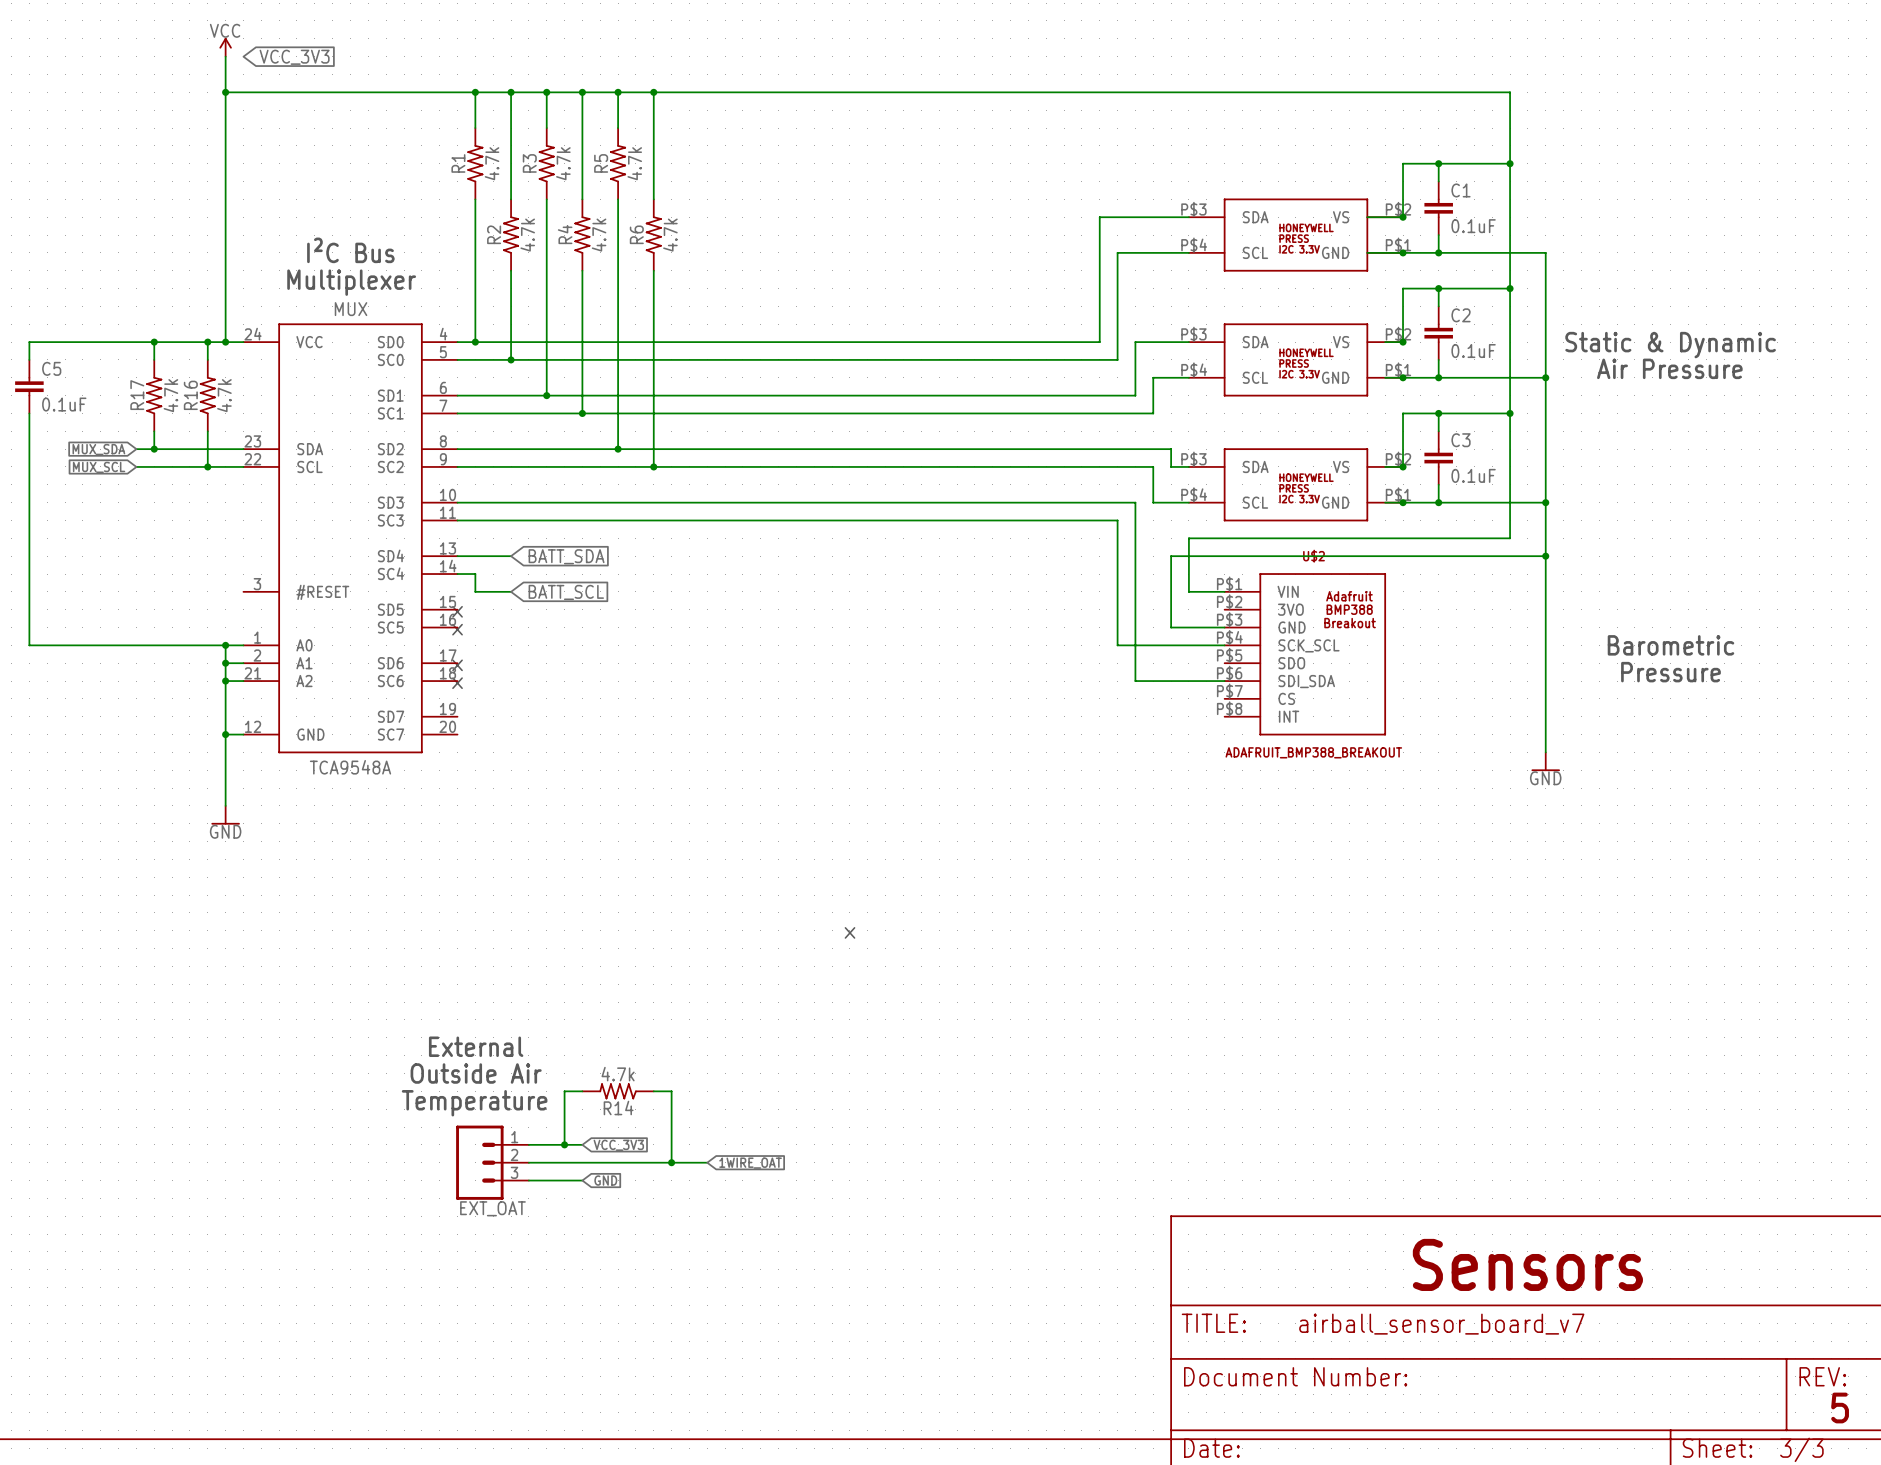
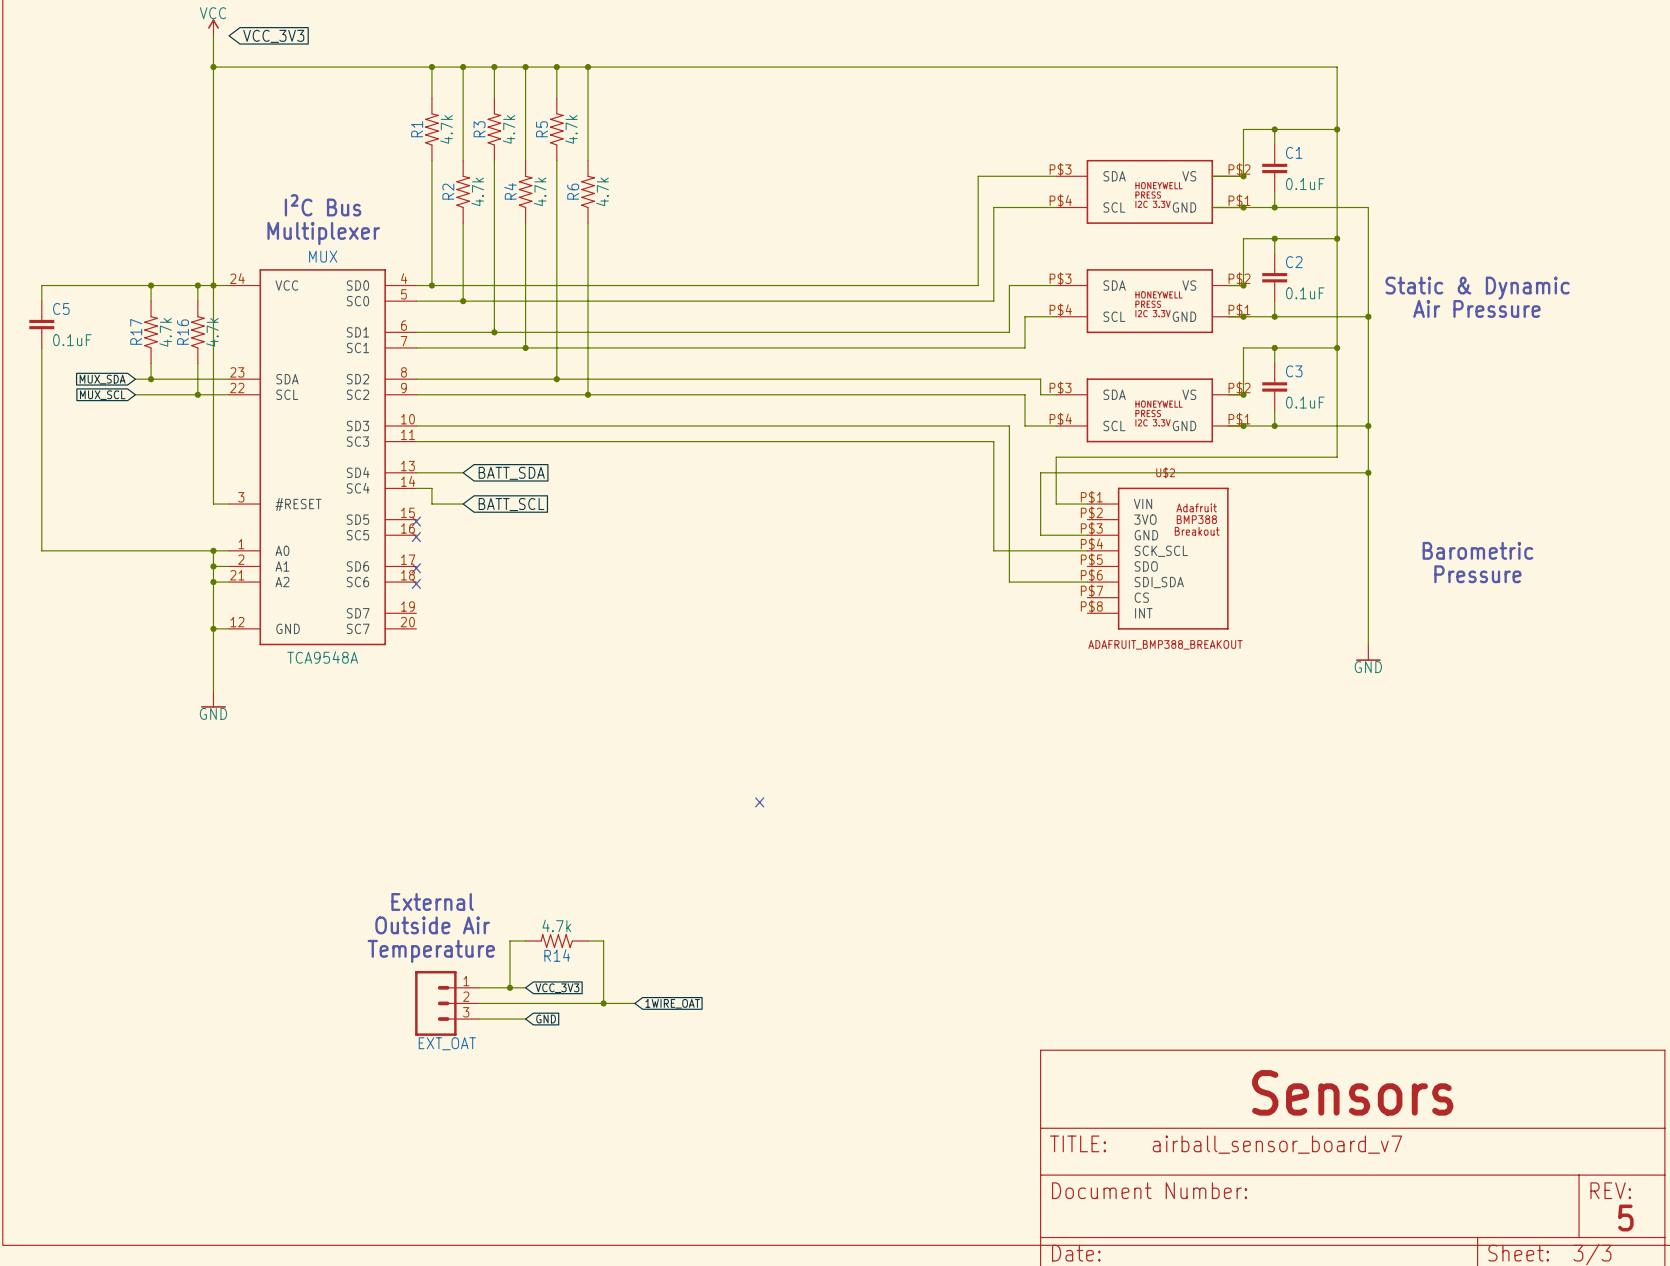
wire: none -> (213, 285) (213, 504) (229, 504)

